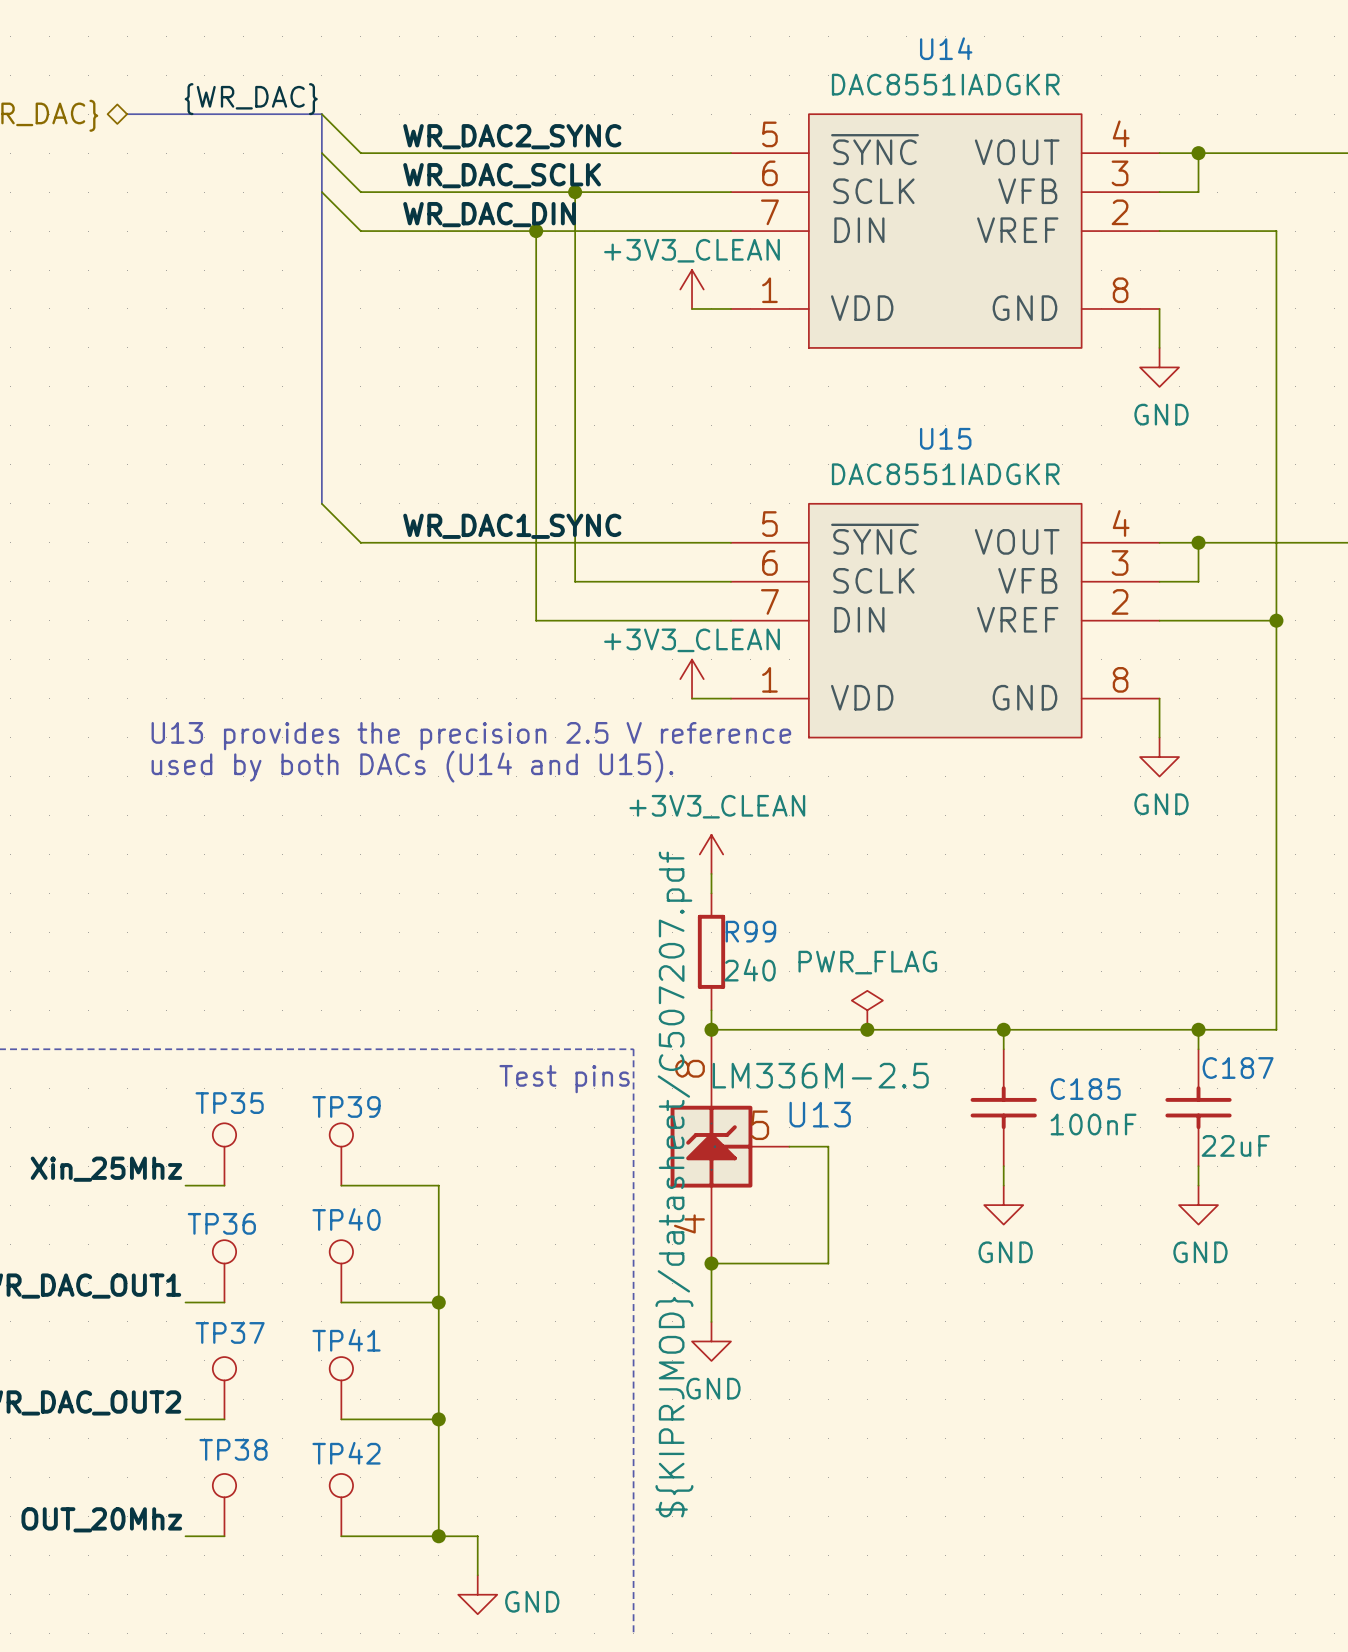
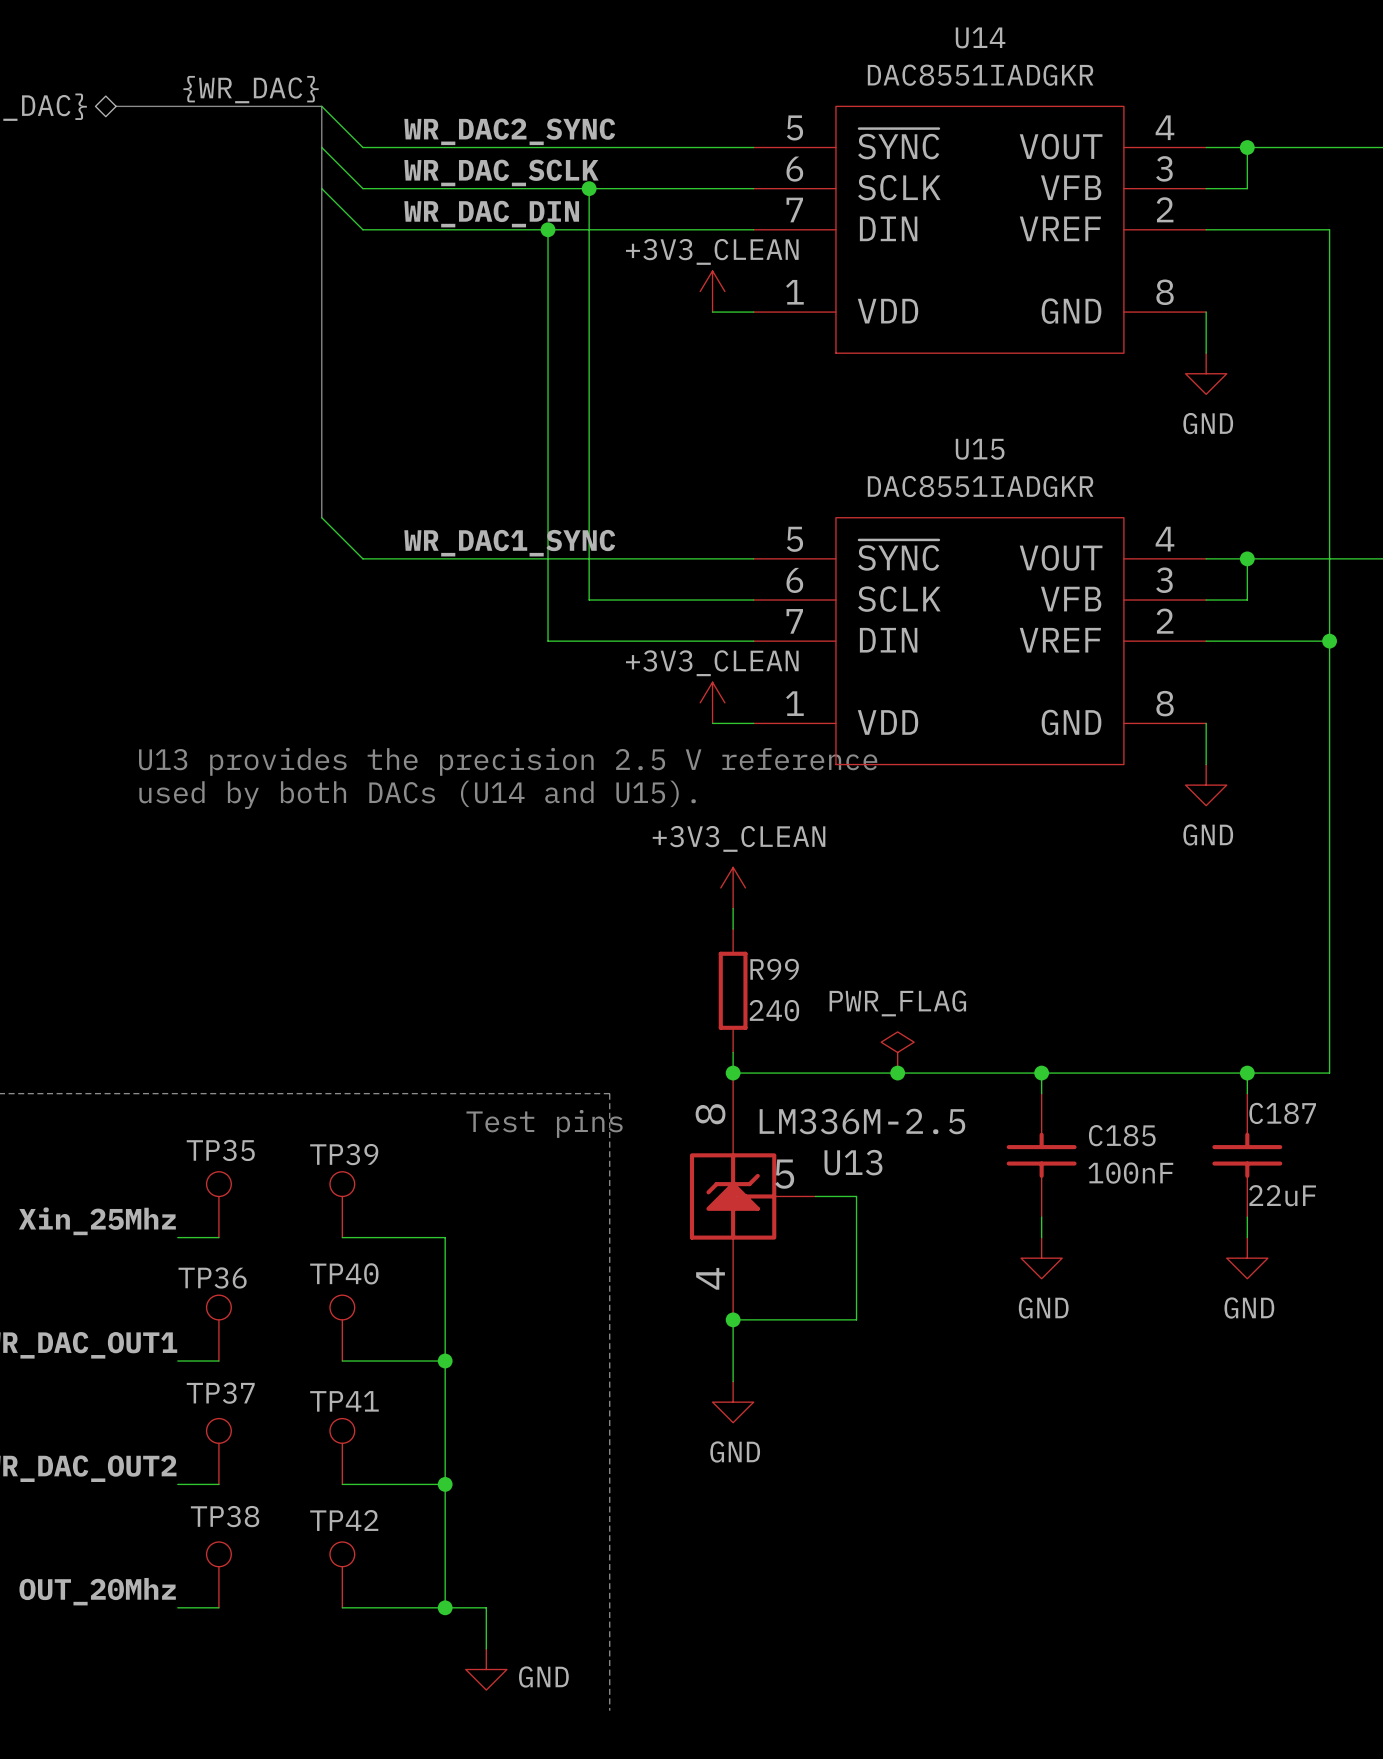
line: (594, 1049) (633, 1049) (633, 1633) -> (609, 1093) (609, 1710)
text position: Test pins (564, 1079) -> Test pins (544, 1123)
U13 text: ${KIPRJMOD}/datasheet/C507207.pdf (674, 1184) -> none

